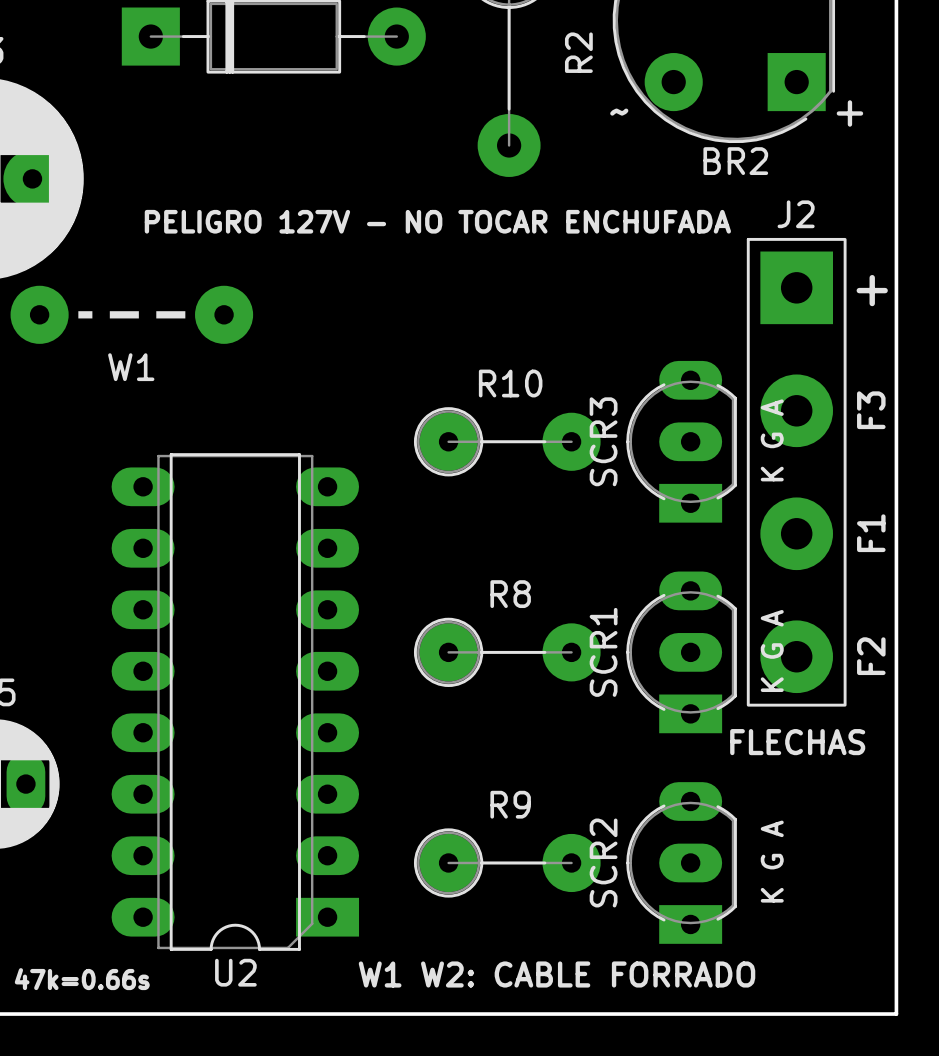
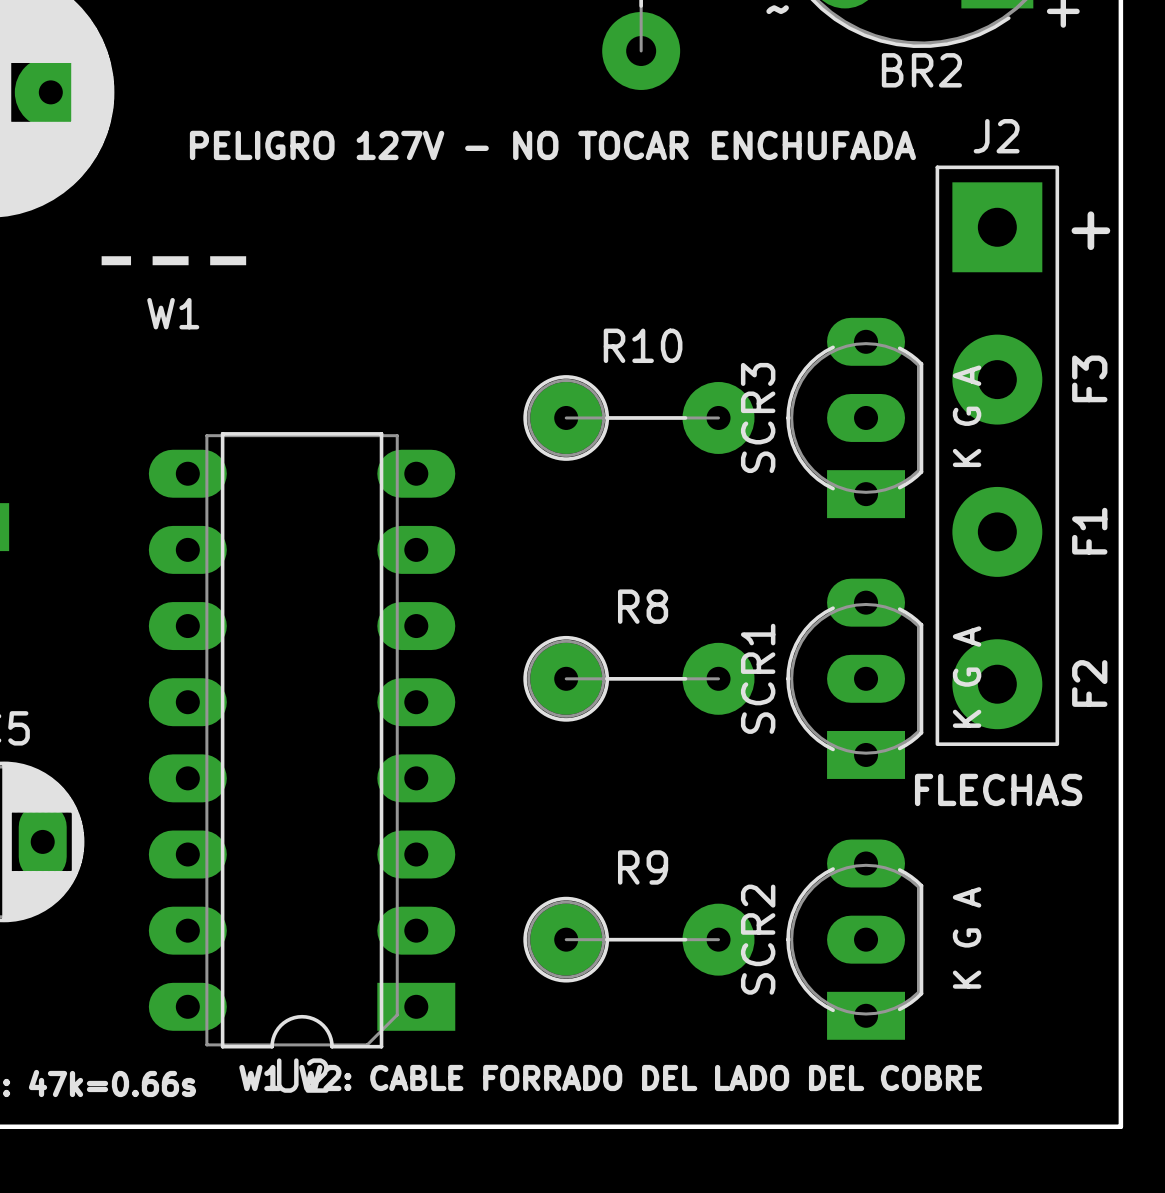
W1 footprint: [10, 285, 254, 344] -> [97, 256, 251, 266]
text: W1 W2: CABLE FORRADO (557, 974) -> W1 W2: CABLE FORRADO DEL LADO DEL COBRE (610, 1077)

